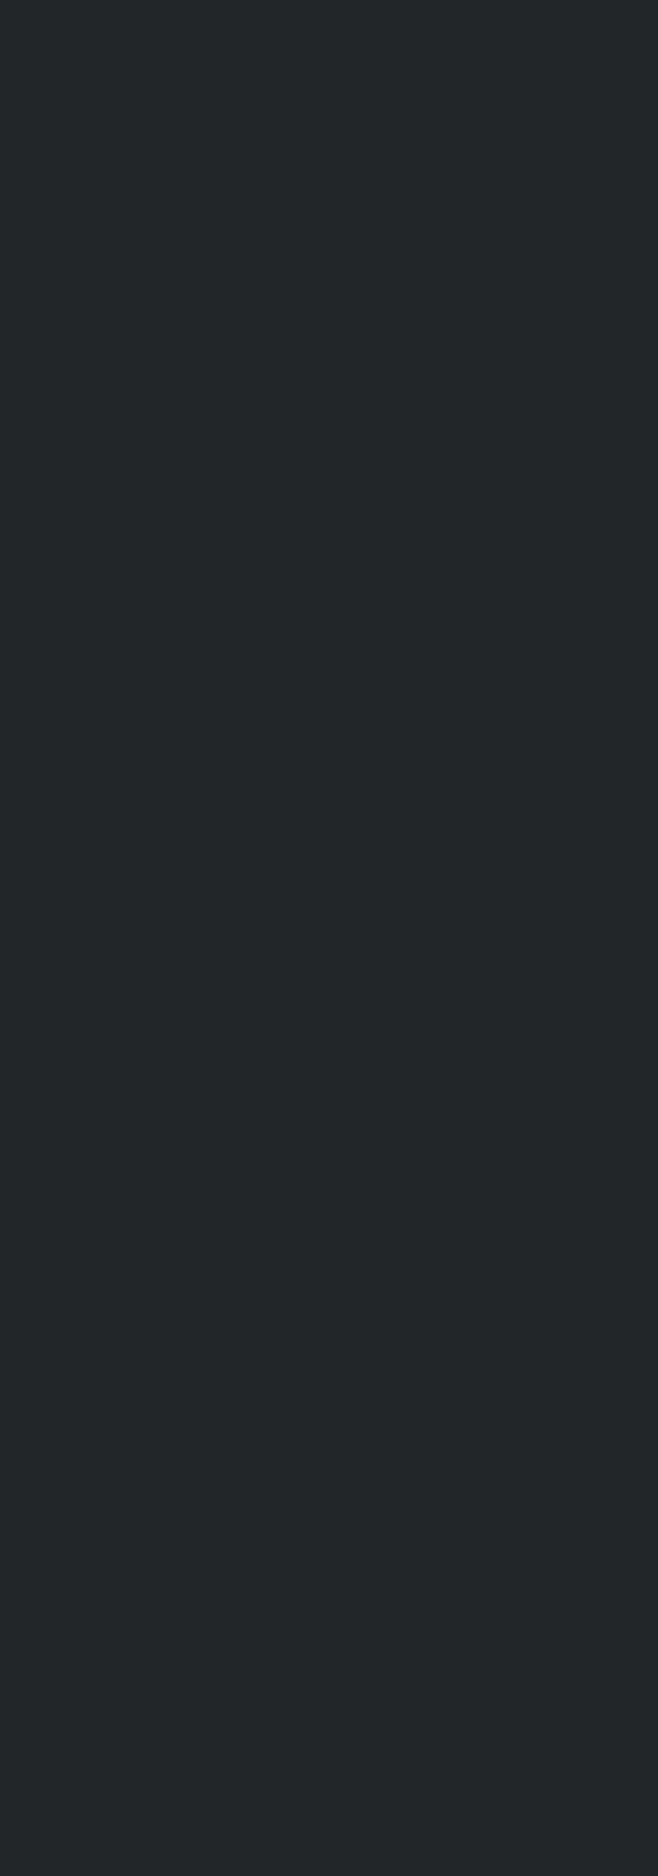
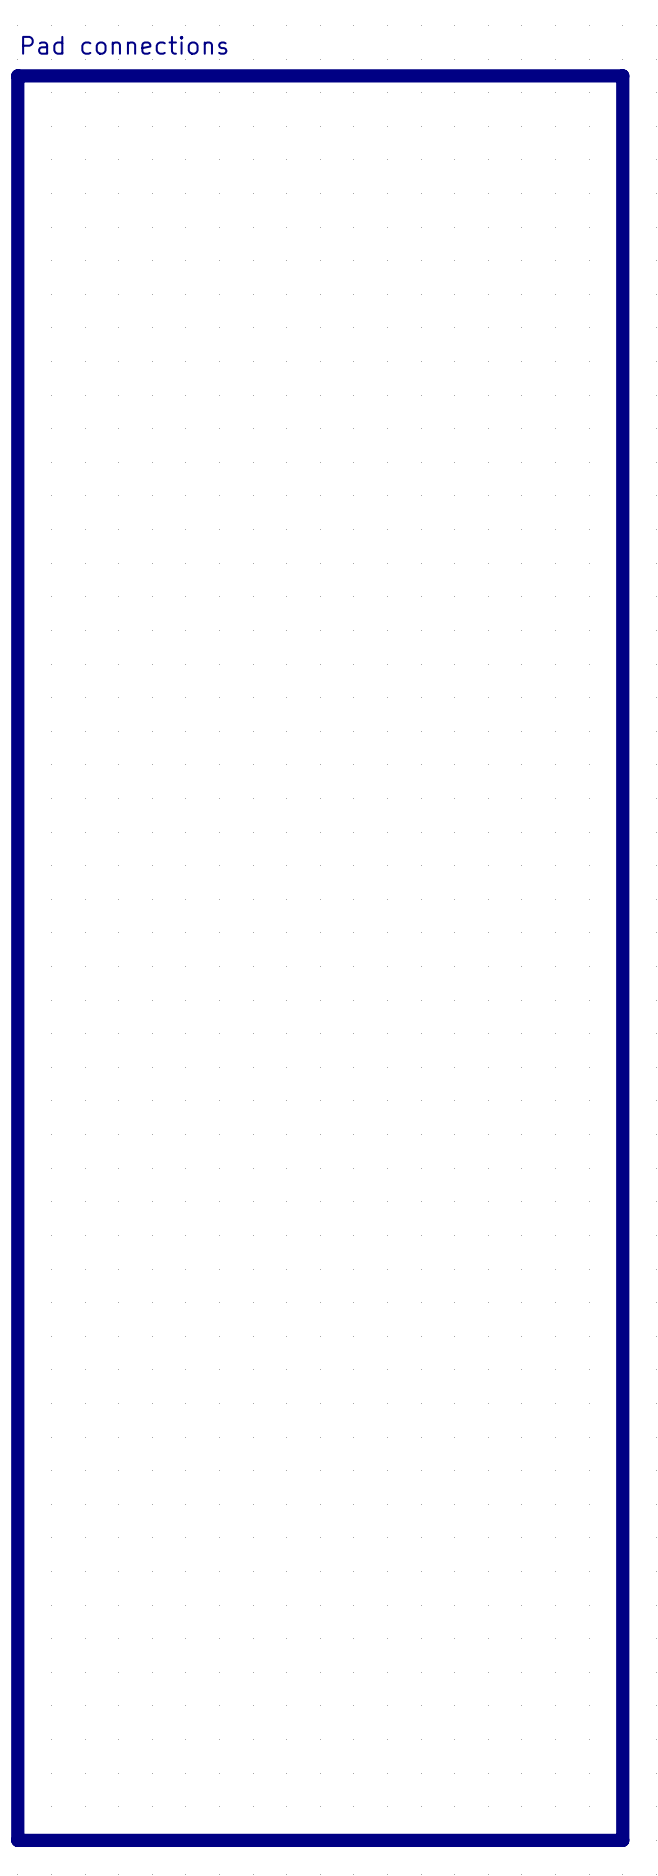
text: none -> Pad connections (124, 45)
line: none -> (17, 75) (622, 75) (622, 1840) (17, 1840) (17, 75)

